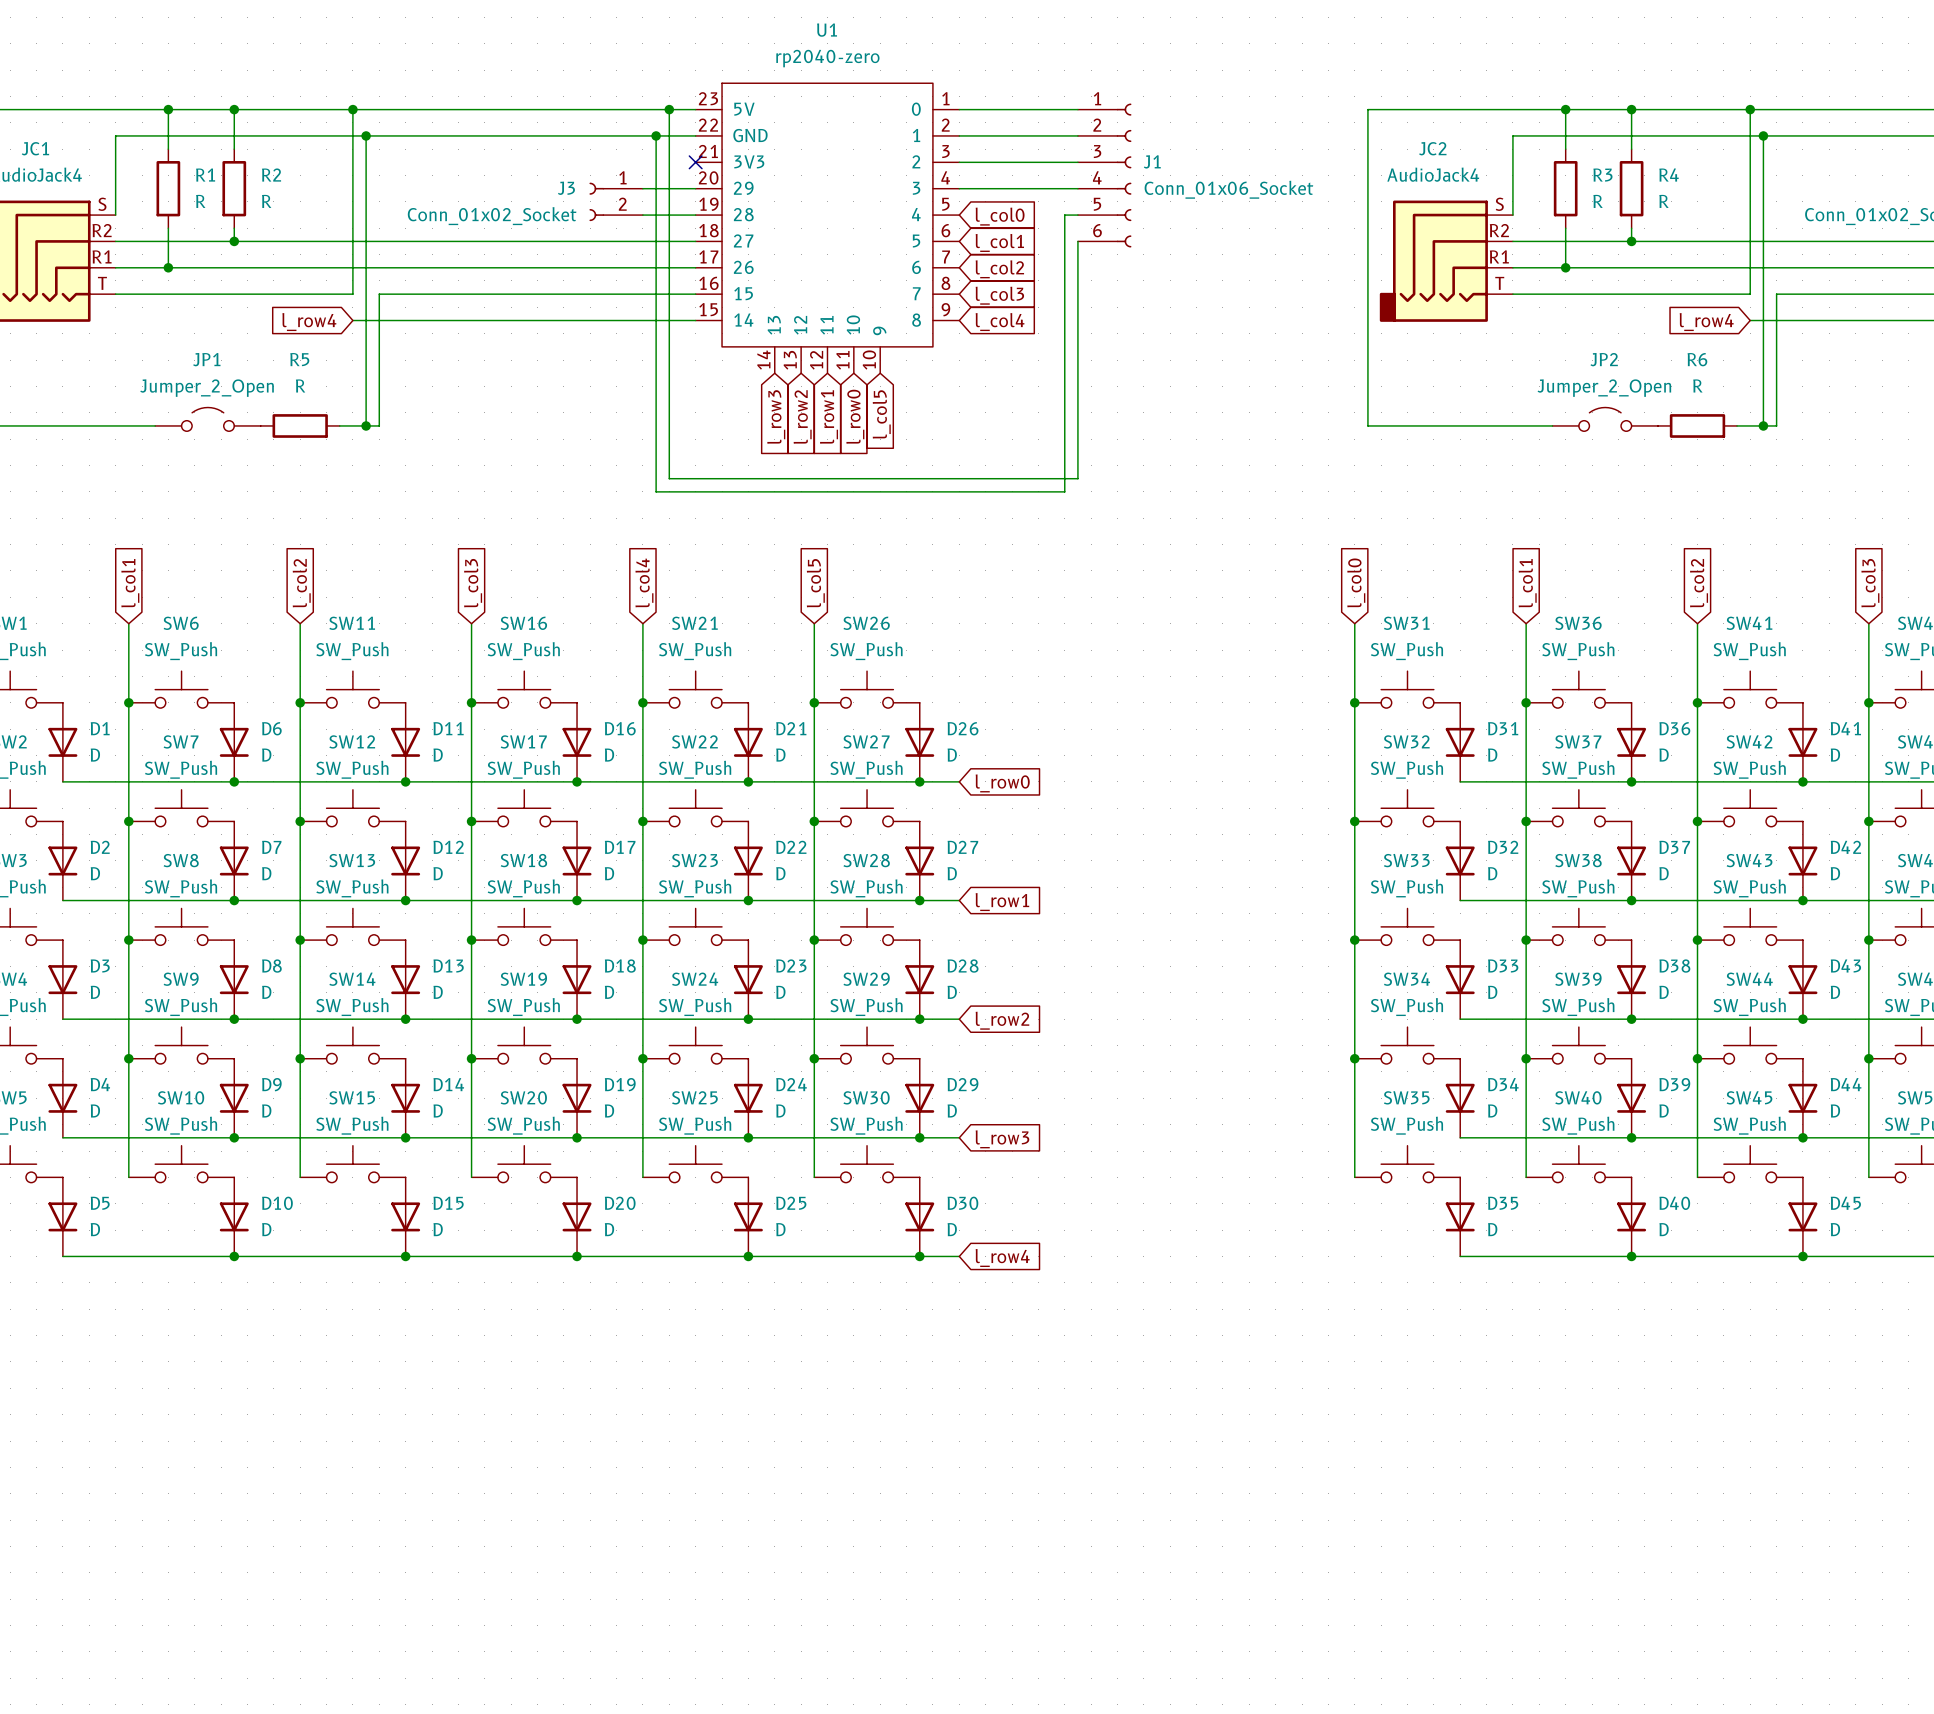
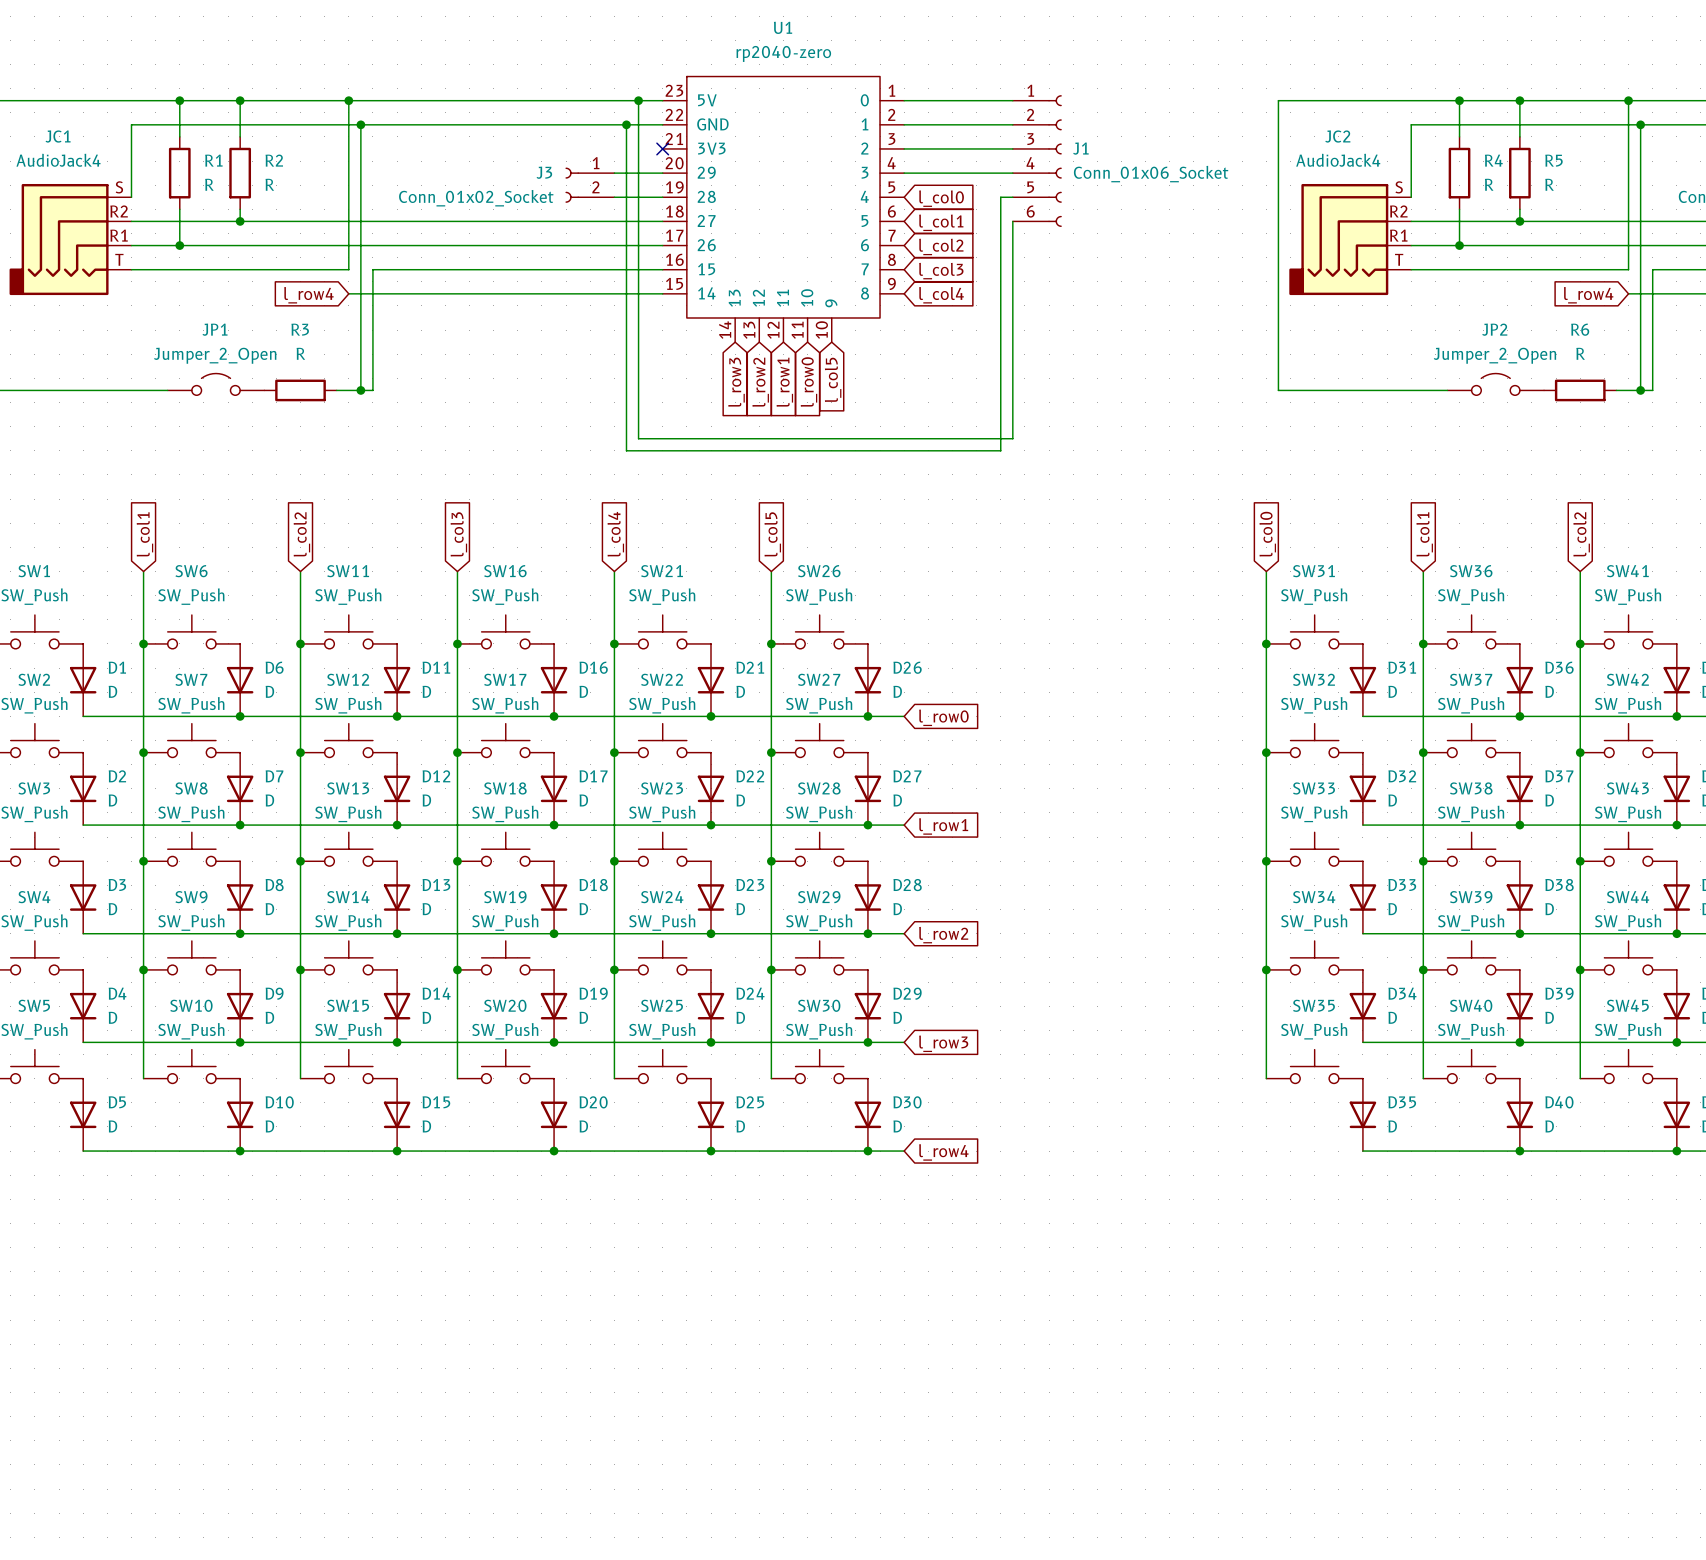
R3 name: R3 (1602, 175) -> R4 (1493, 160)
R4 name: R4 (1669, 175) -> R5 (1553, 160)
R5 name: R5 (299, 359) -> R3 (300, 329)

